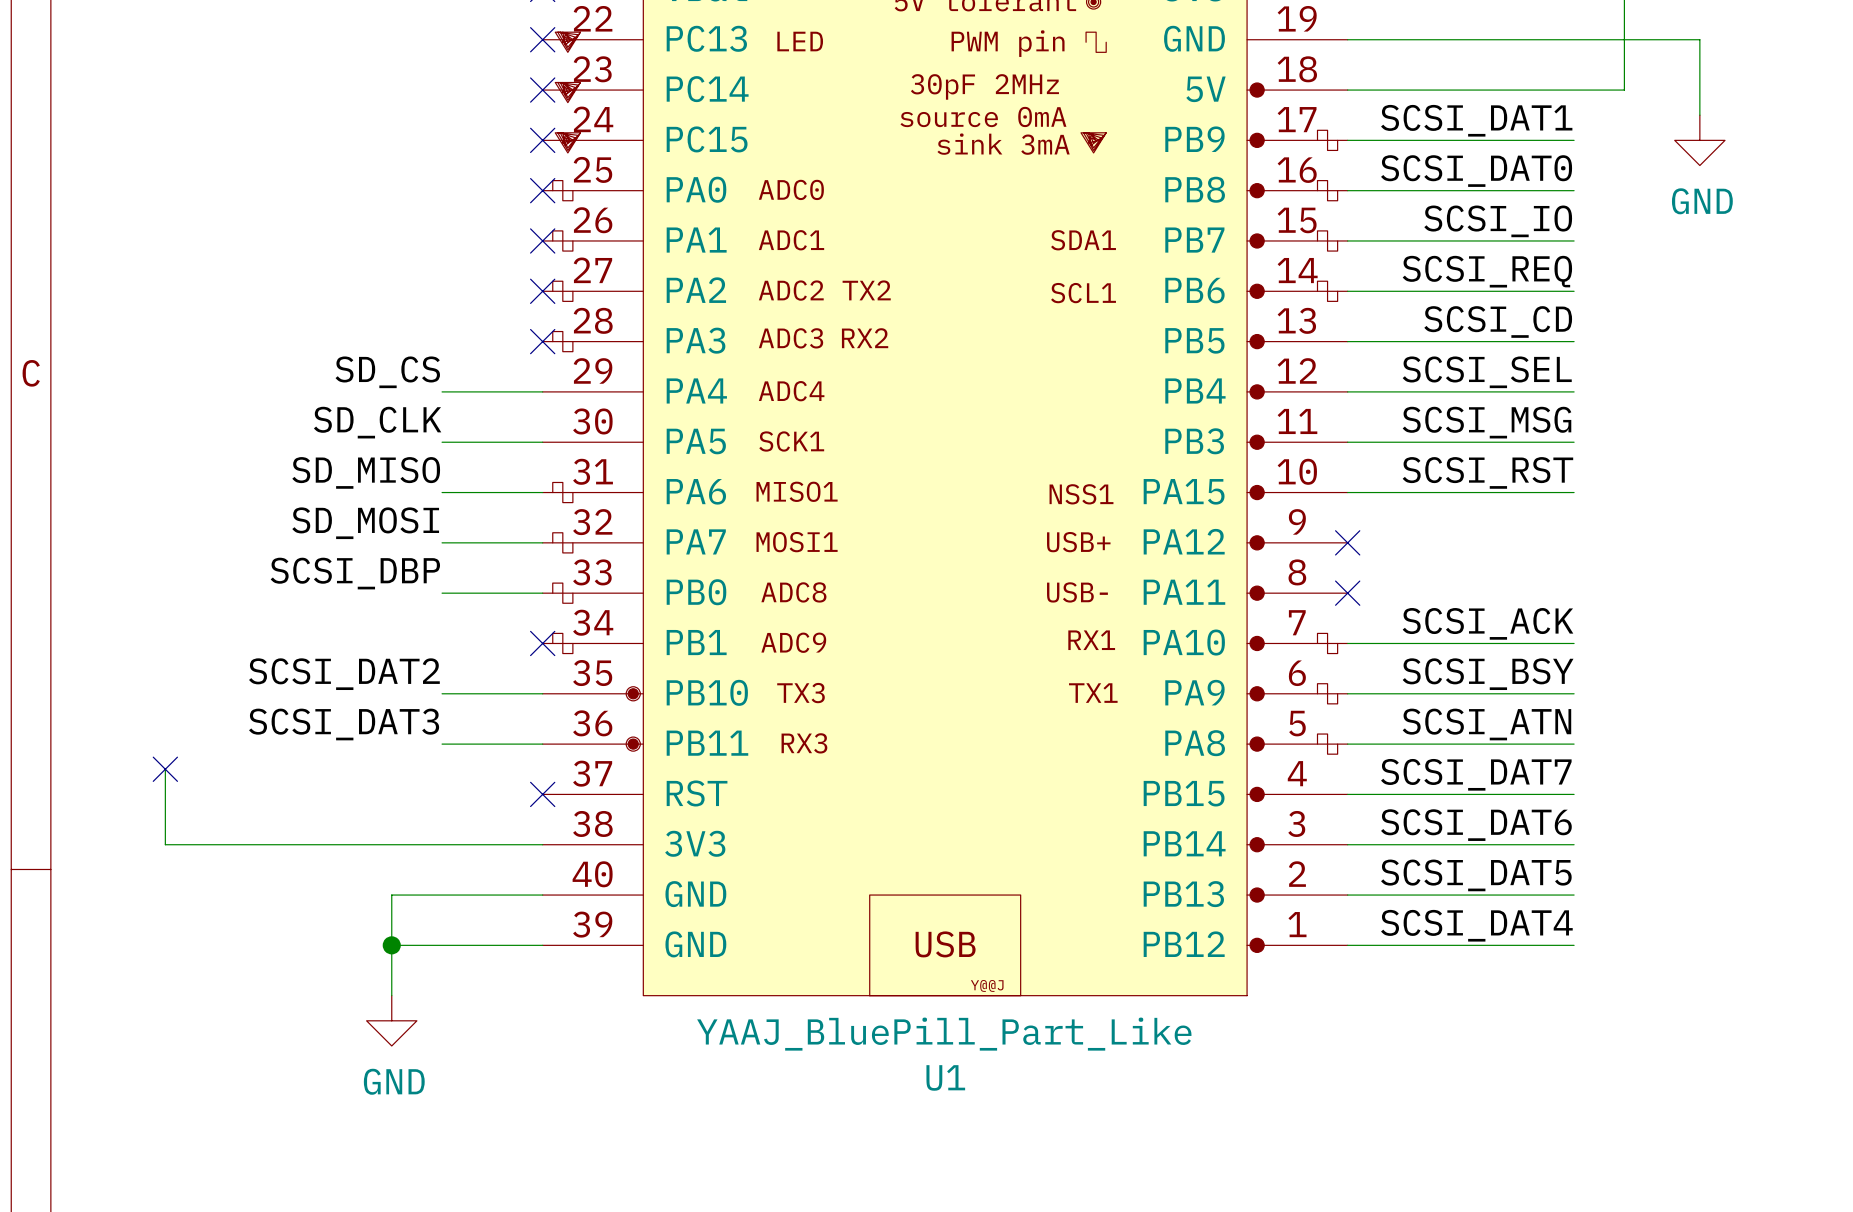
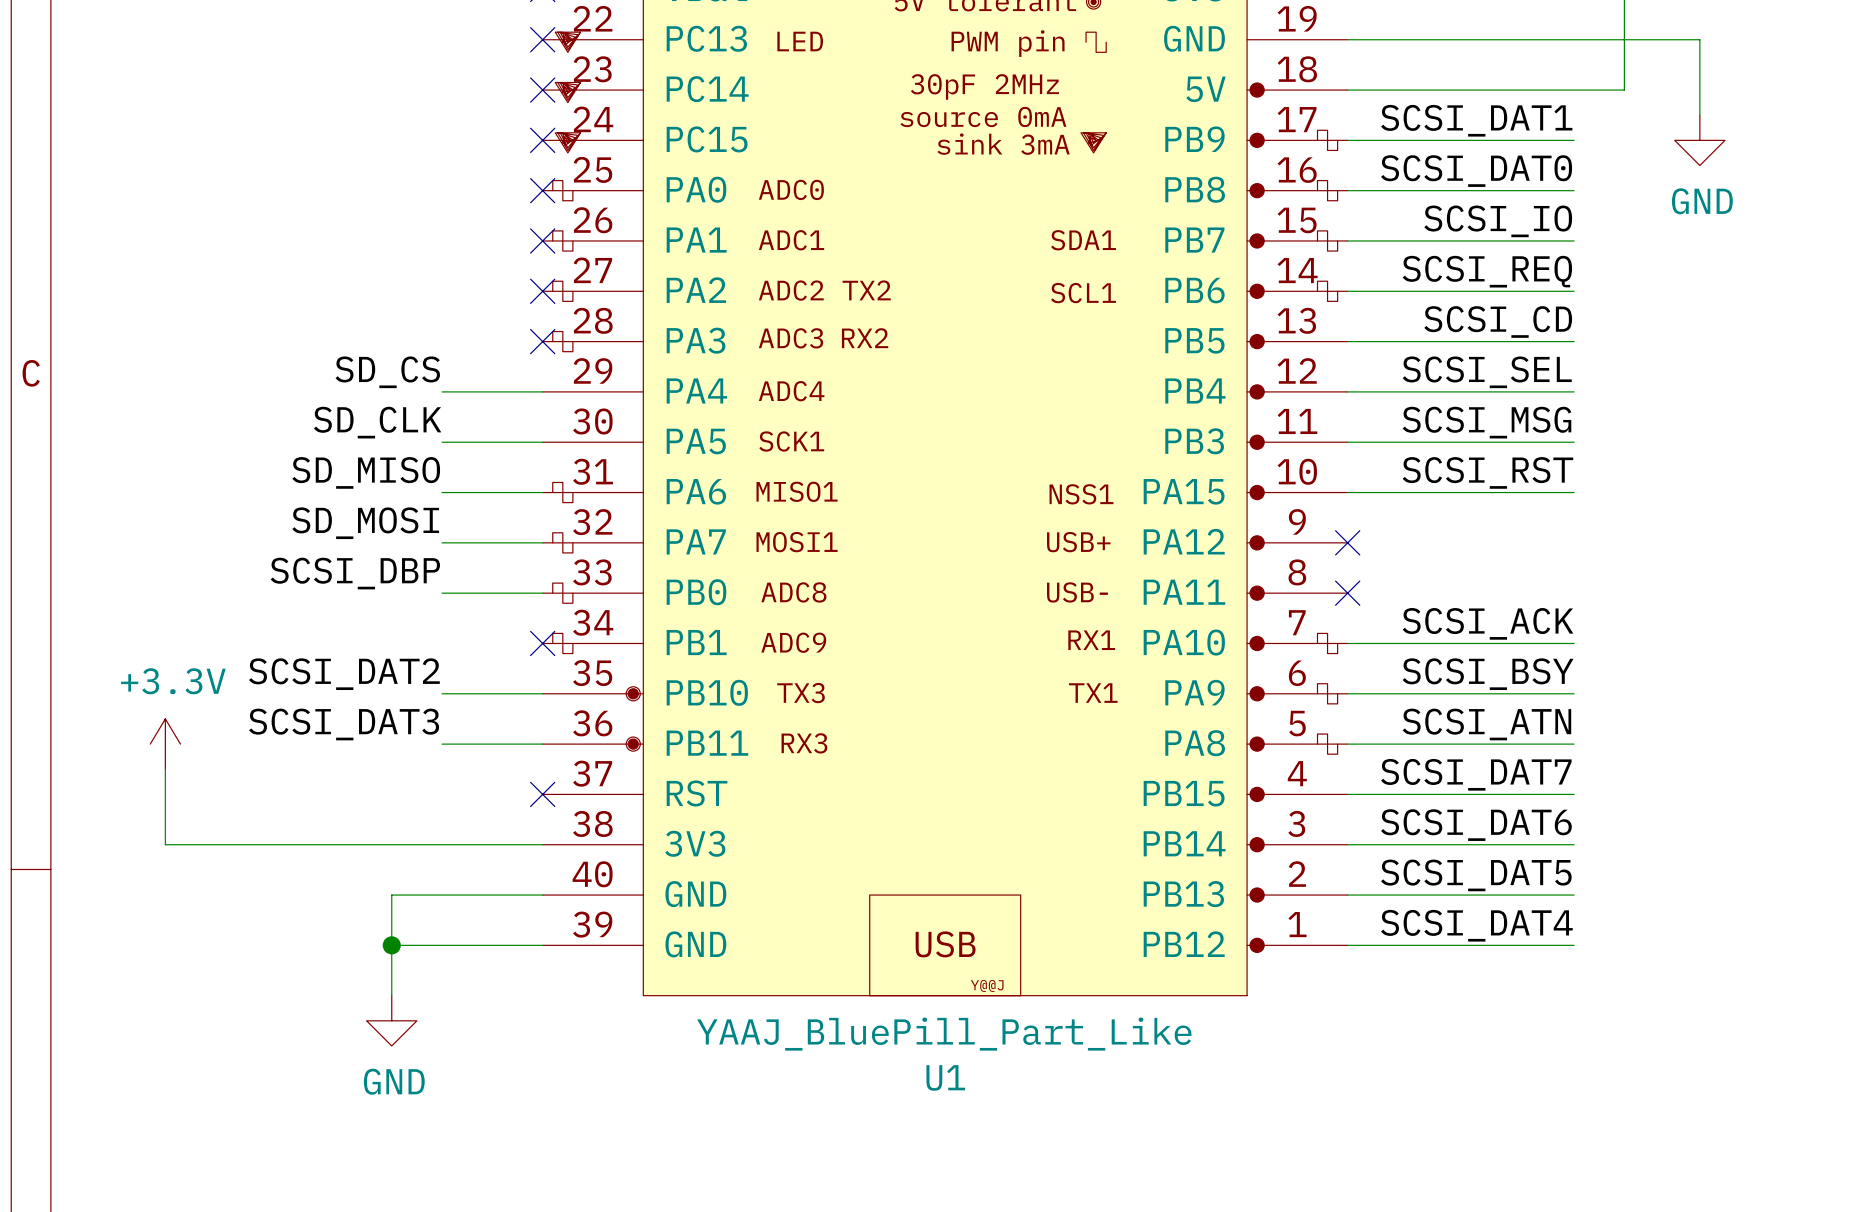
power symbol: none -> +3.3V (165, 744)
no-connect mark: (165, 769) -> none

